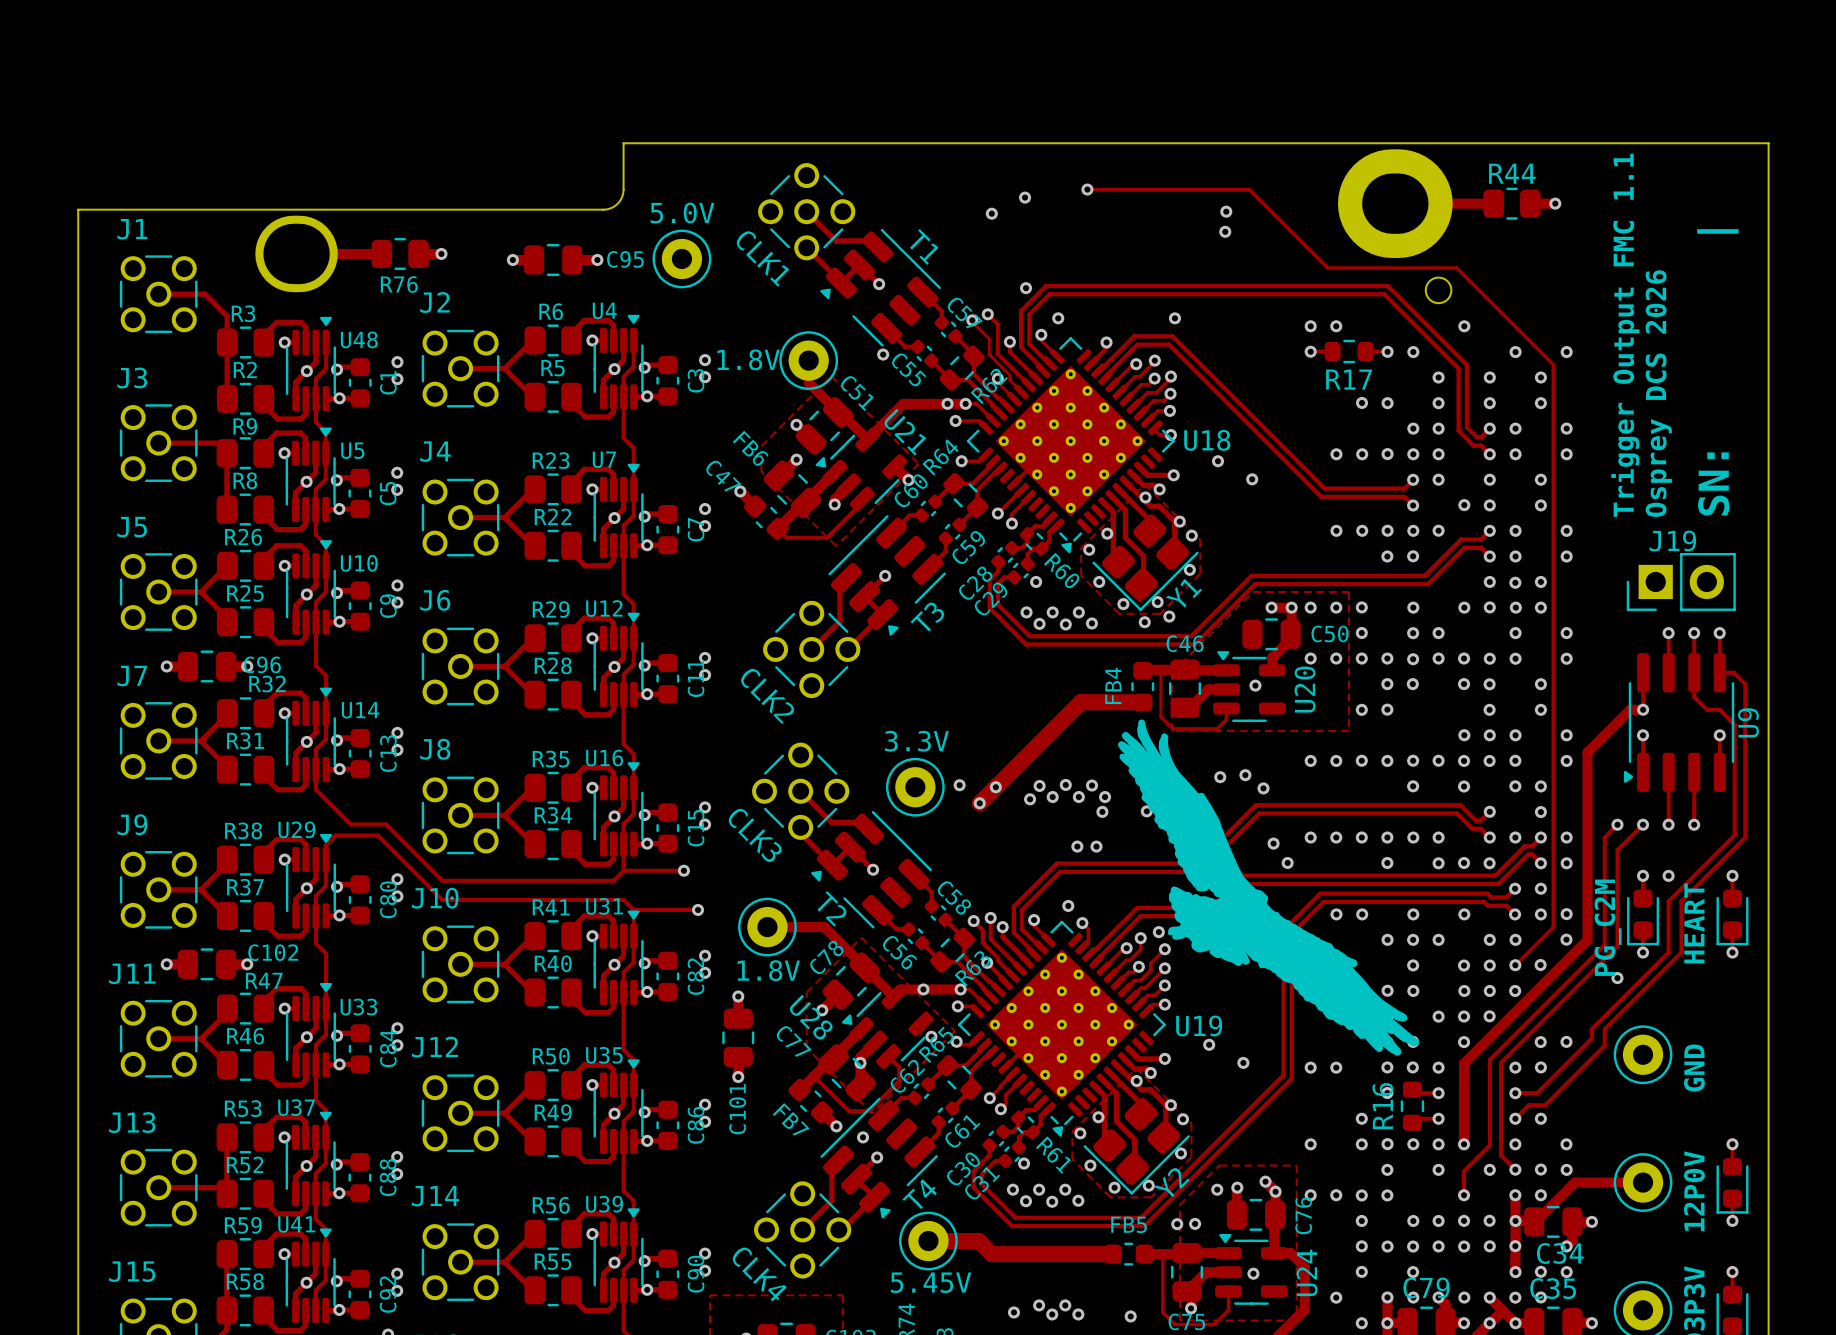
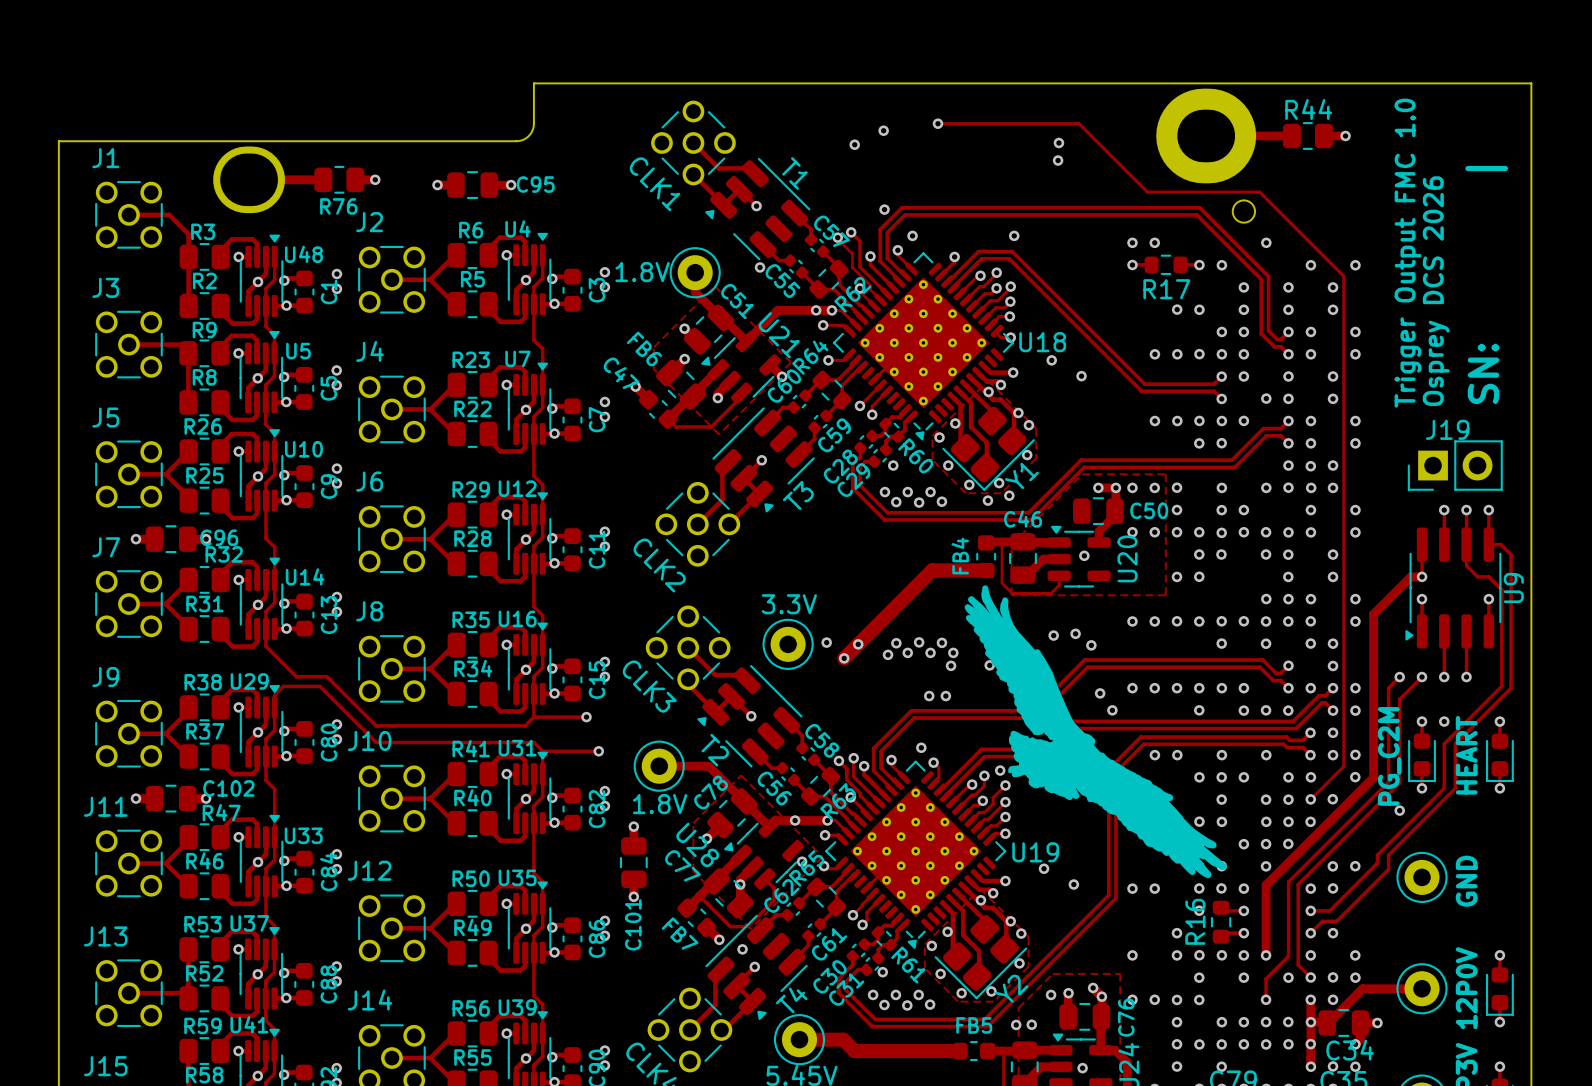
text: 5.0V (682, 212) -> none
part: (681, 258) -> none
text: Trigger Output FMC 1.1 (1625, 335) -> Trigger Output FMC 1.0 (1408, 253)

